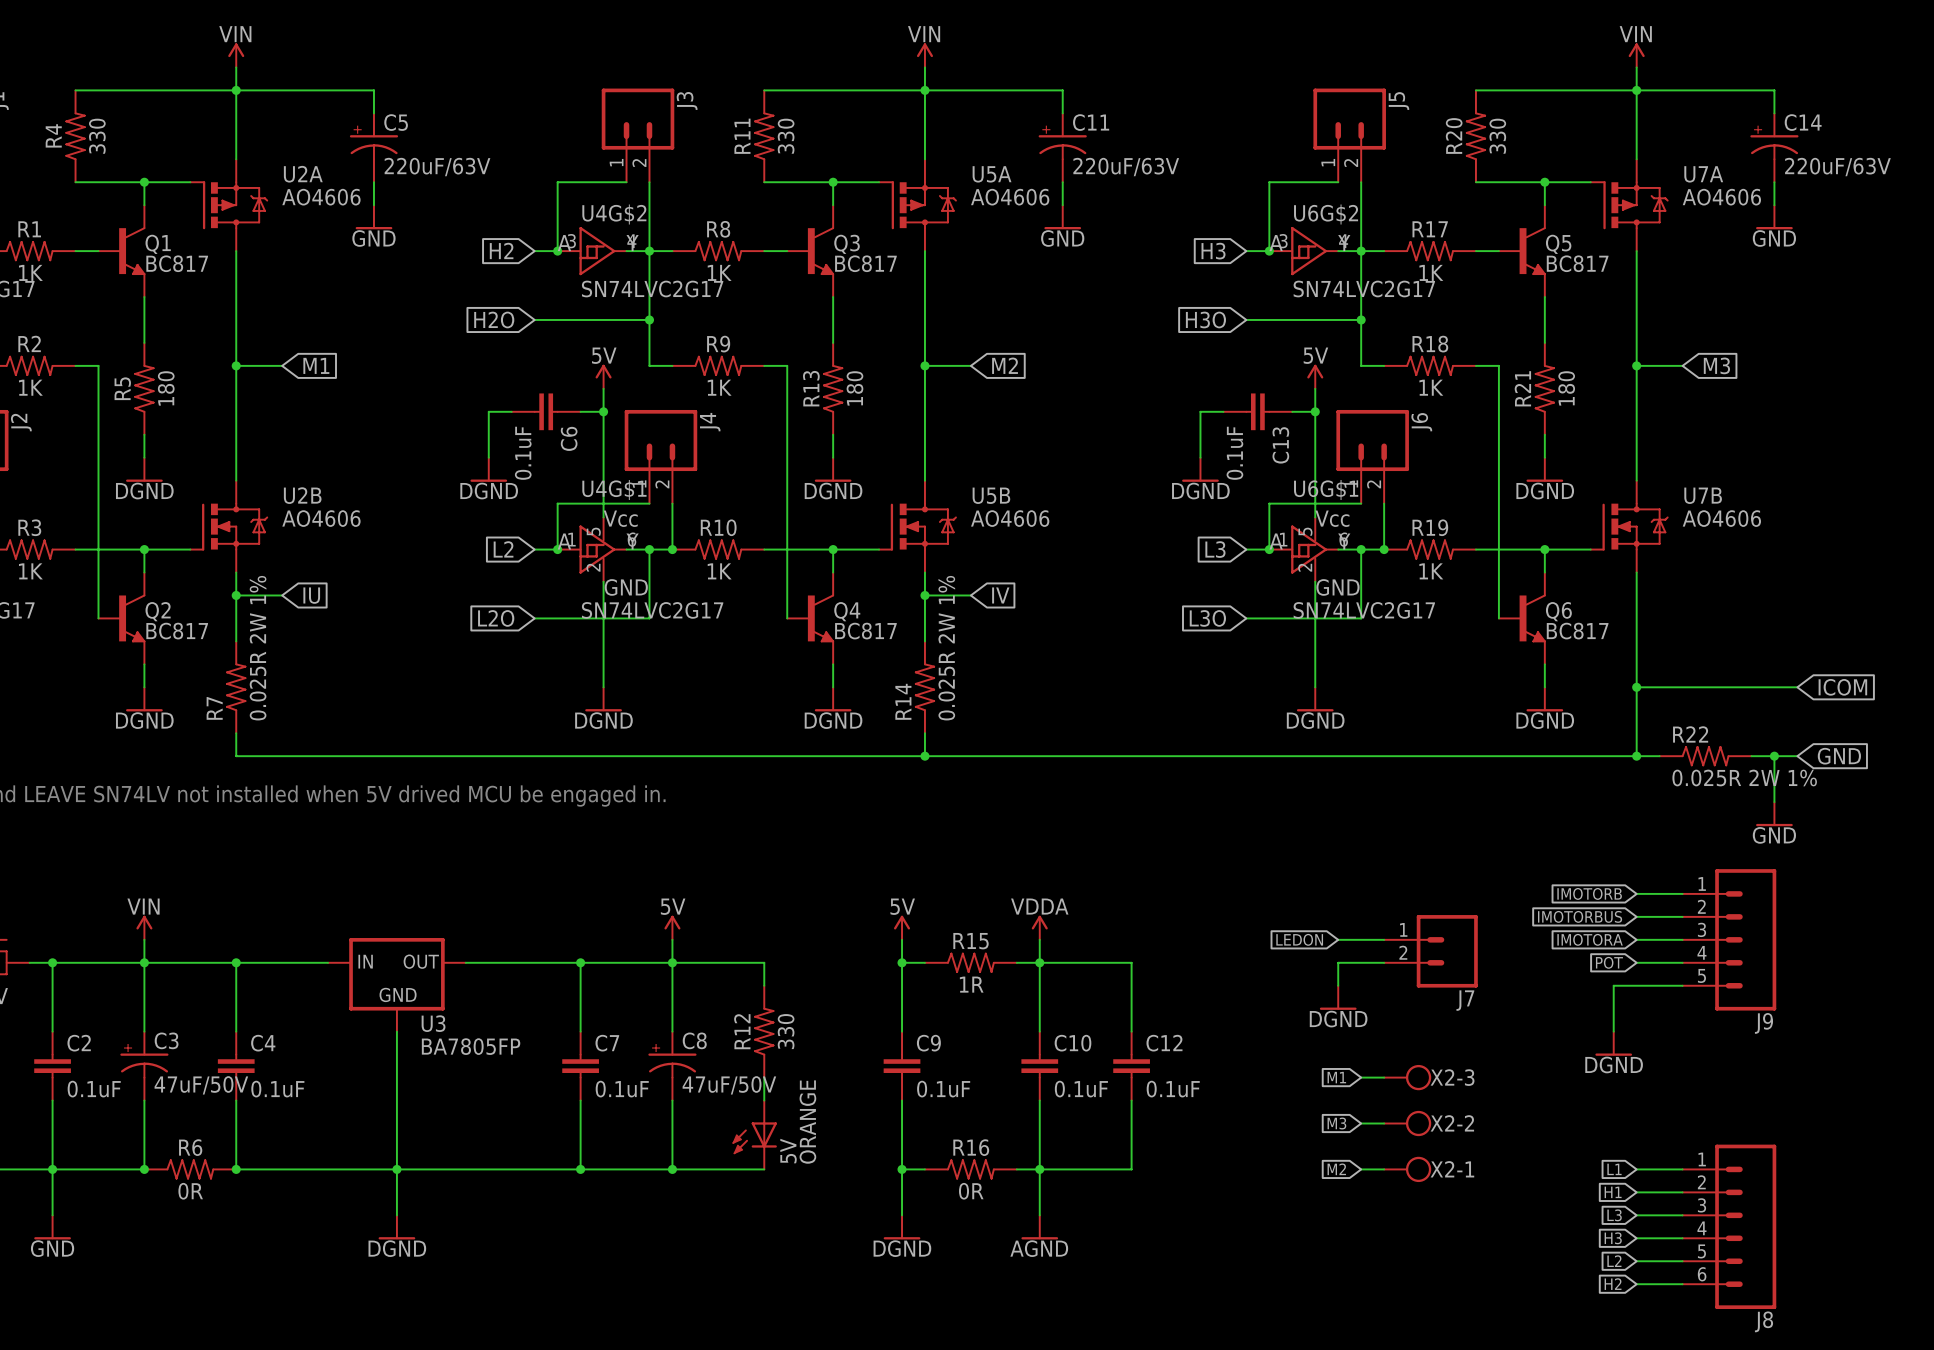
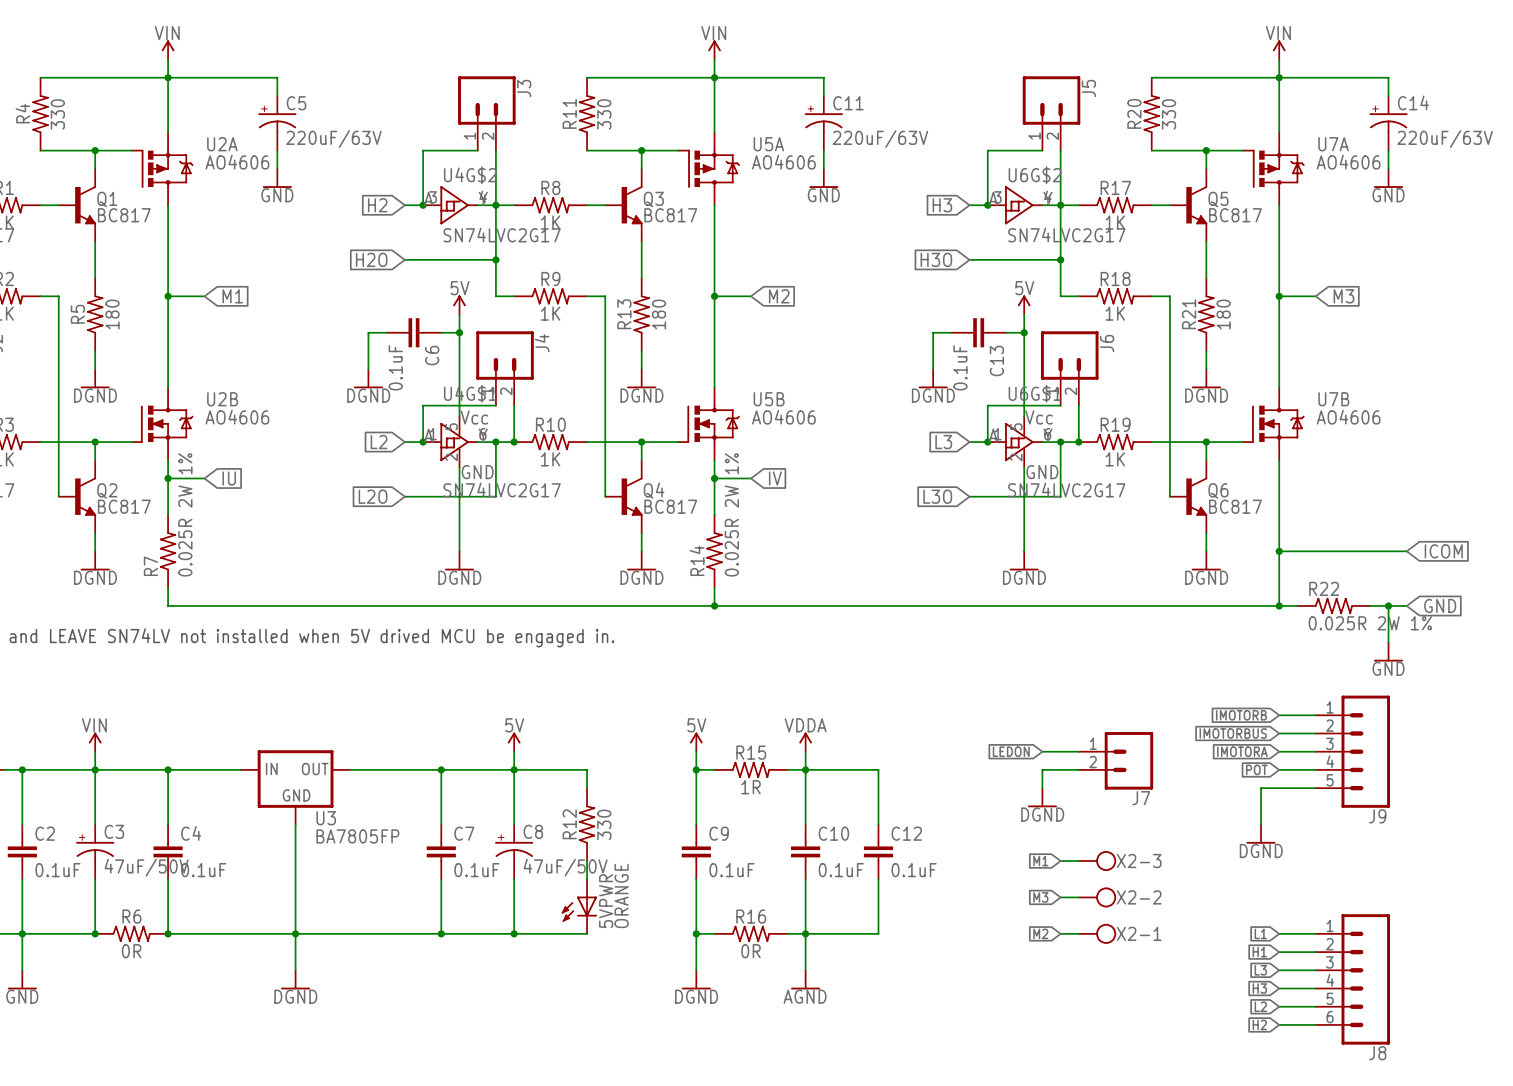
5V name: 5V (788, 1151) -> 5VPWR (606, 901)

